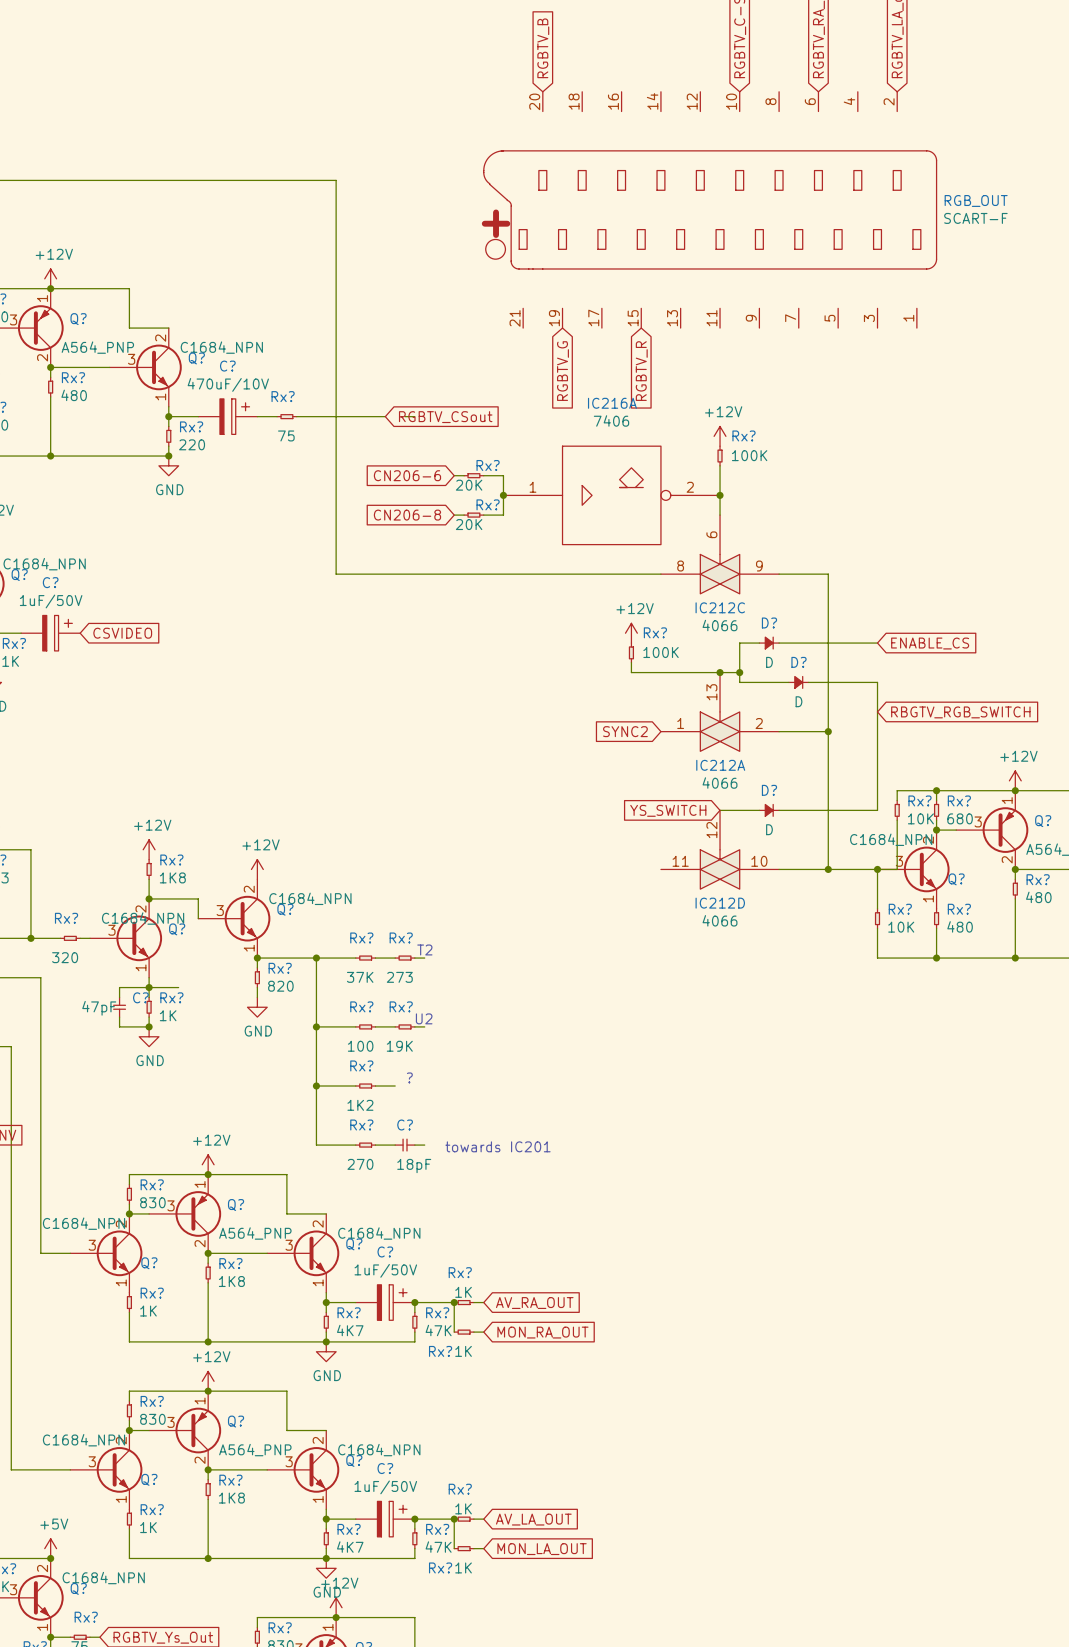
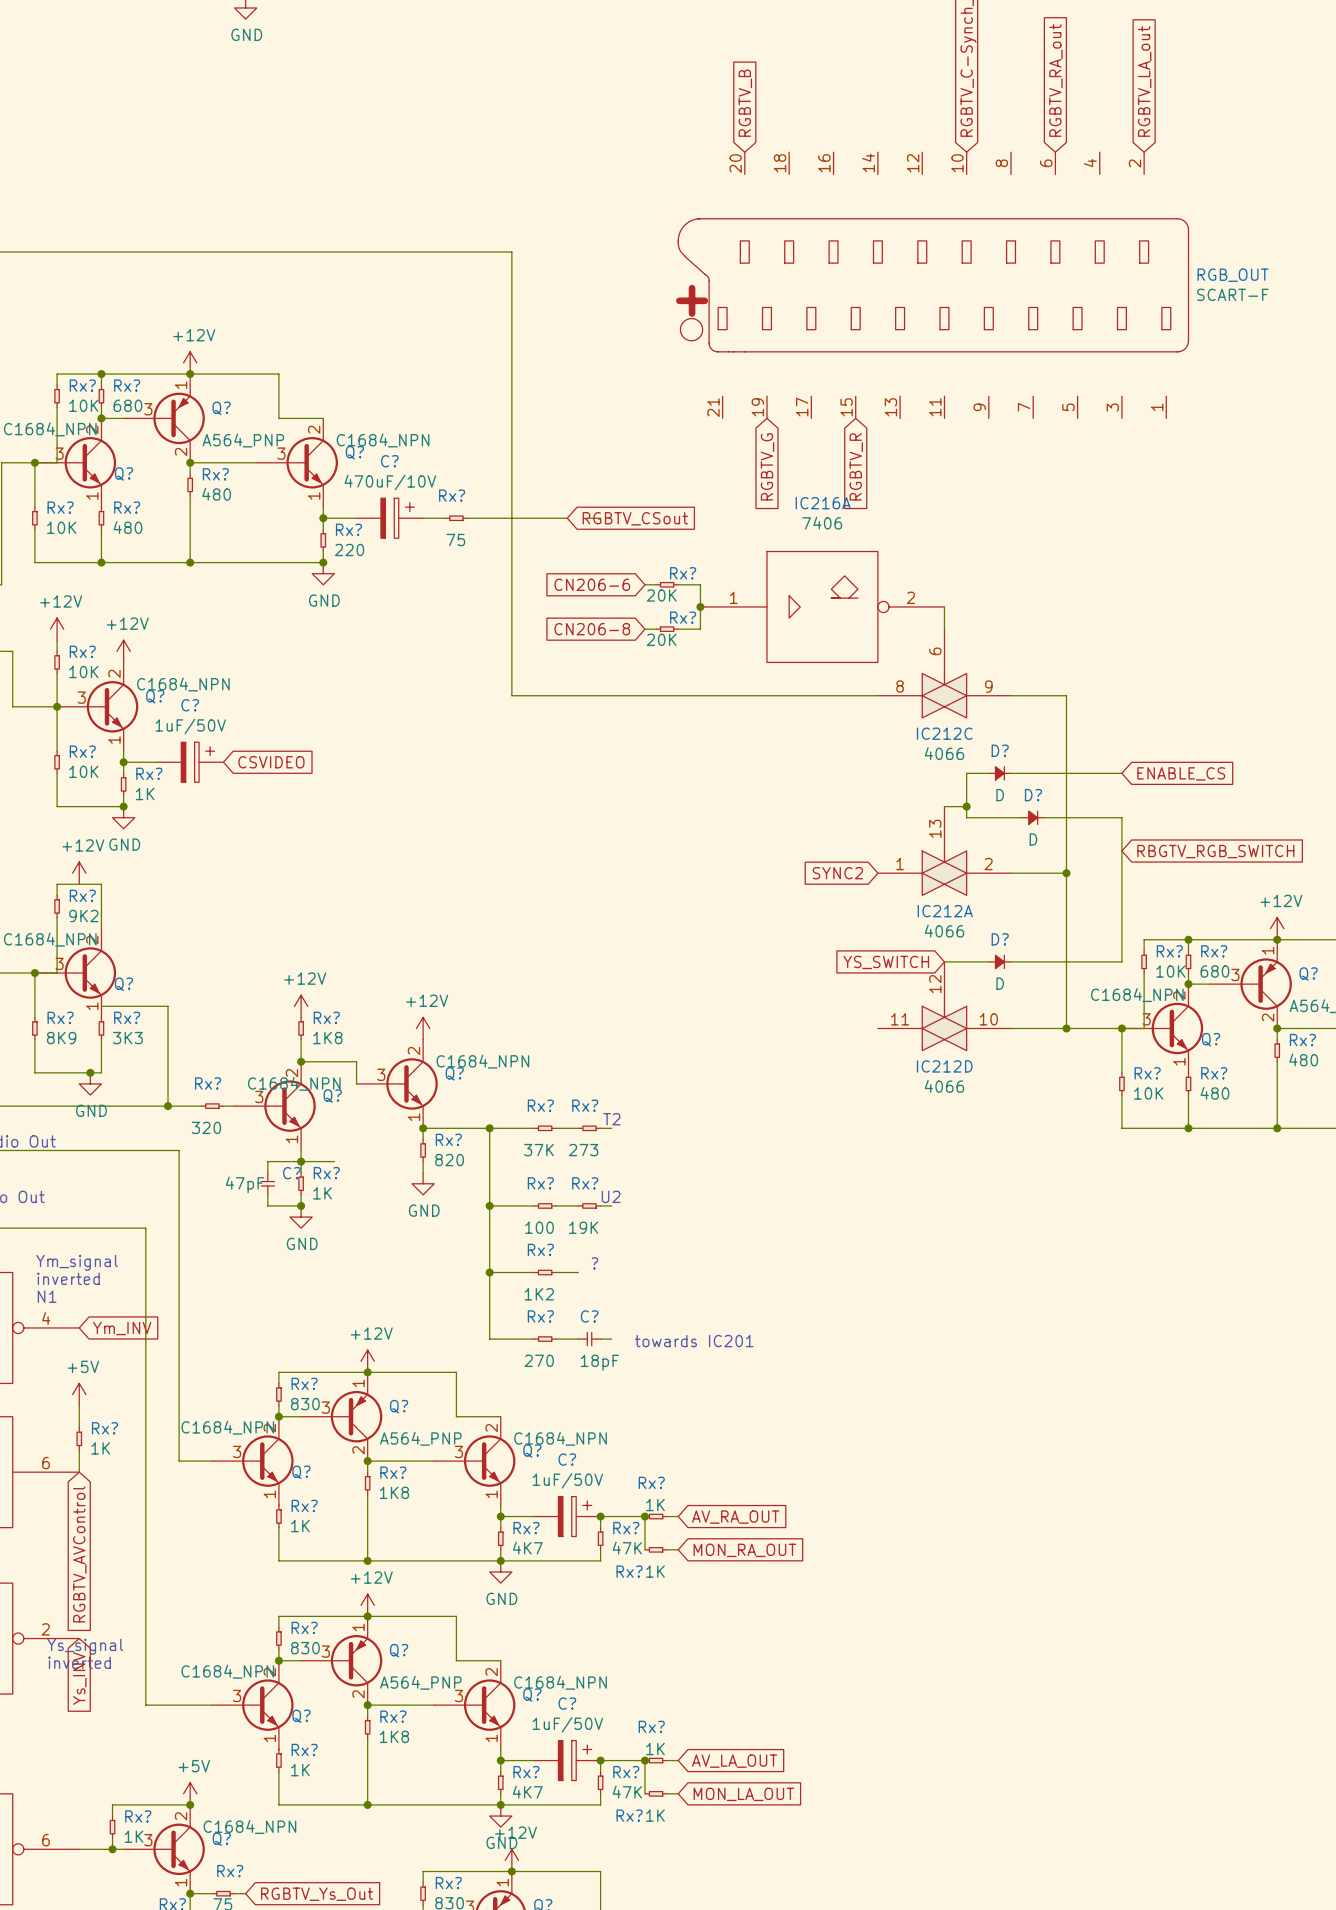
power symbol: +12V (720, 436) -> none
Rx?: 100K (720, 456) -> none
wire: (720, 465) (720, 495) -> none
junction: (720, 495) -> none
power symbol: +12V (631, 633) -> none
Rx?: 100K (631, 652) -> none
wire: (631, 662) (631, 672) (720, 672) -> none
junction: (720, 672) -> none

